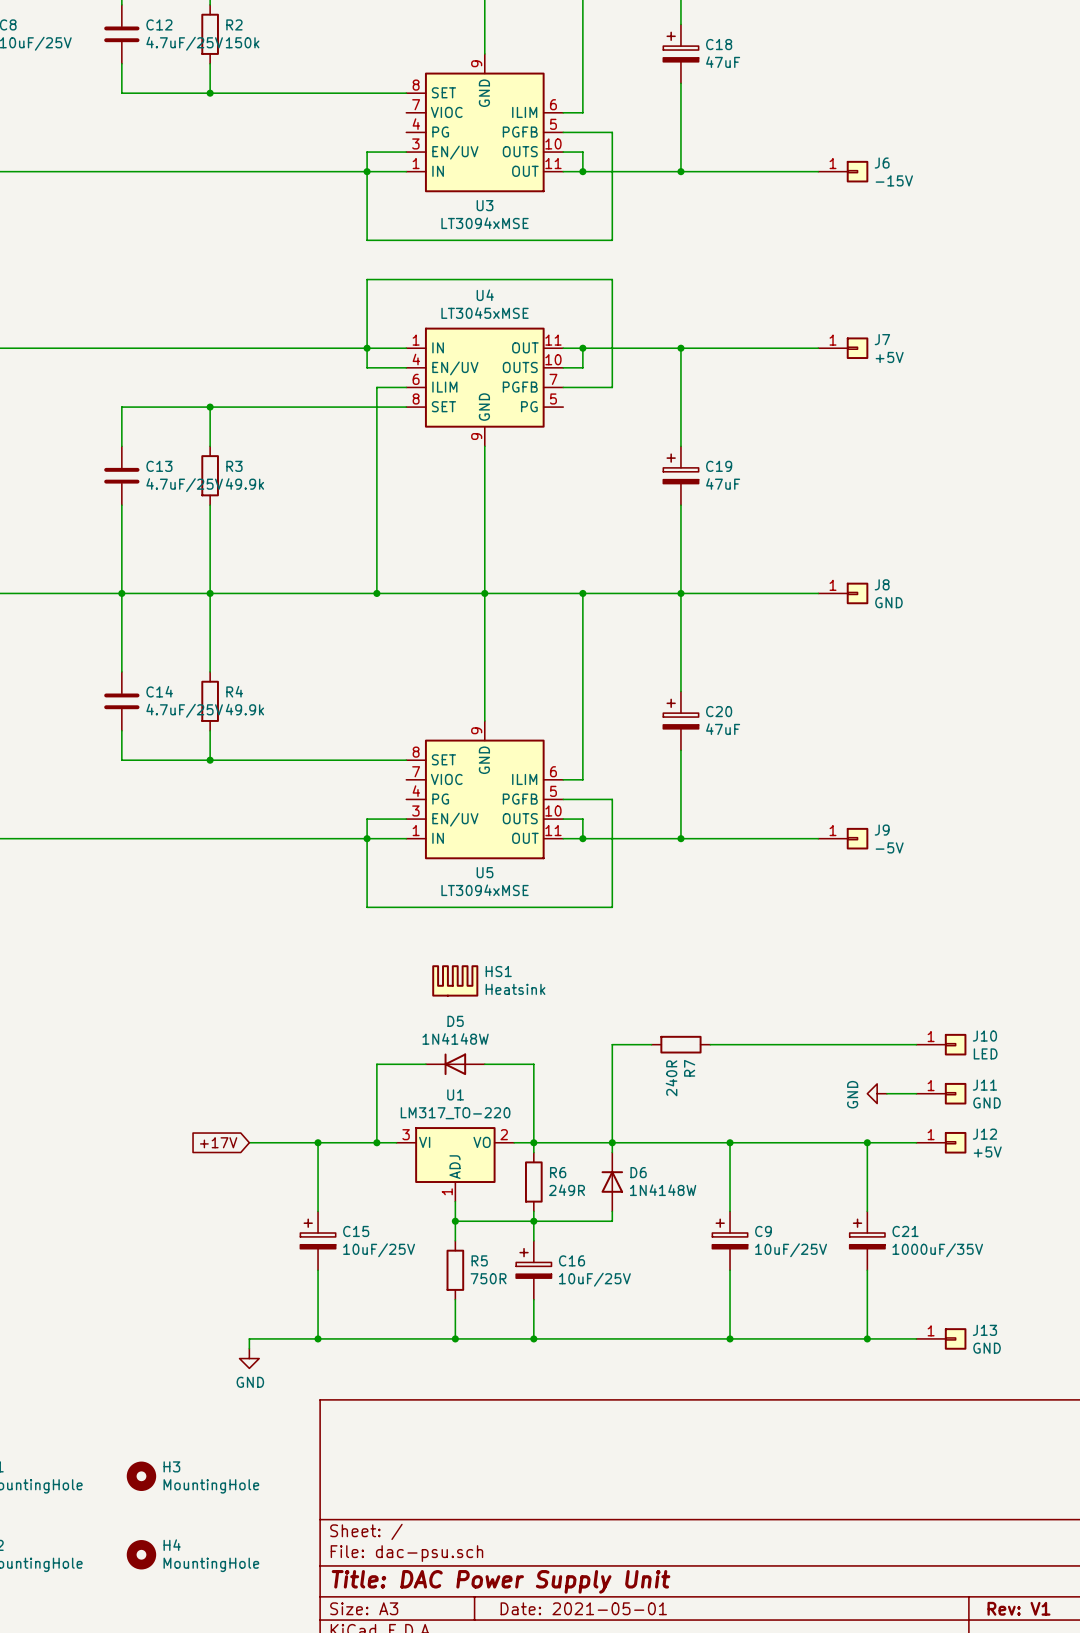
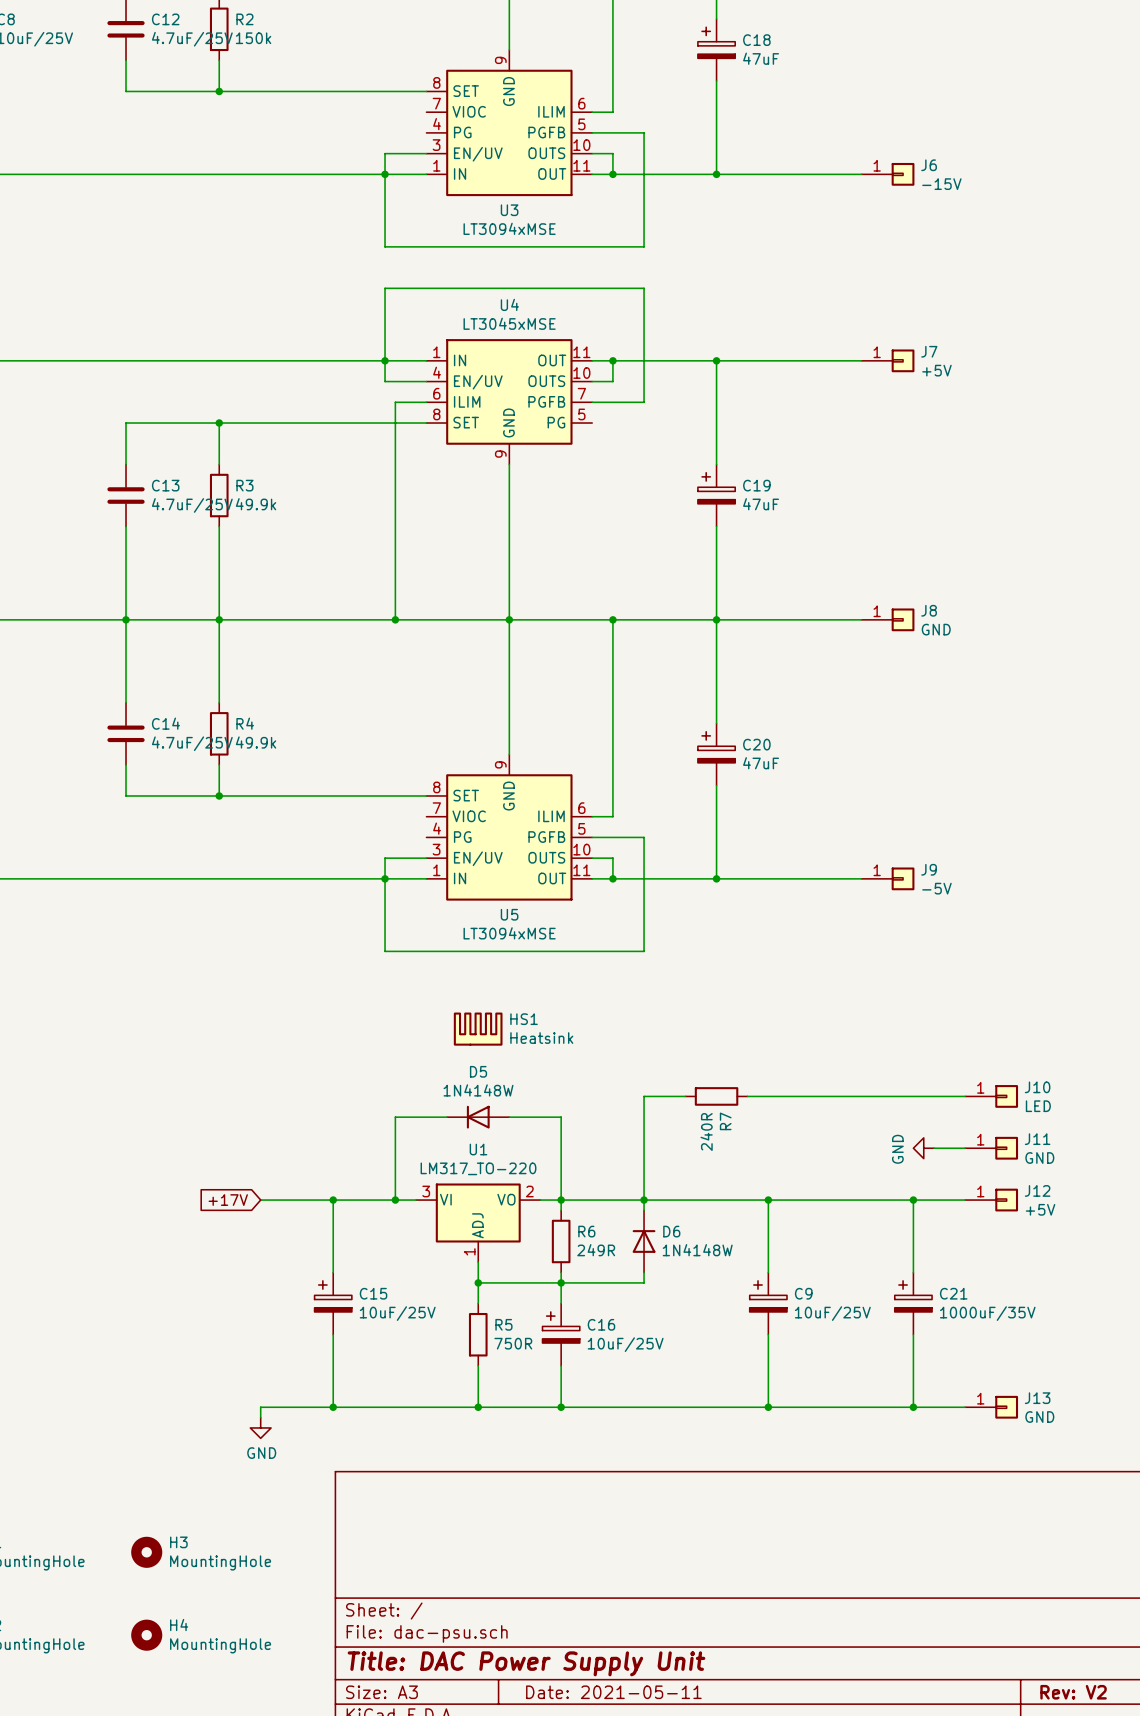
title block: Date: 2021-05-01 (583, 1608) -> Date: 2021-05-11 (613, 1692)
title block: Rev: V1 (1018, 1608) -> Rev: V2 (1073, 1692)

